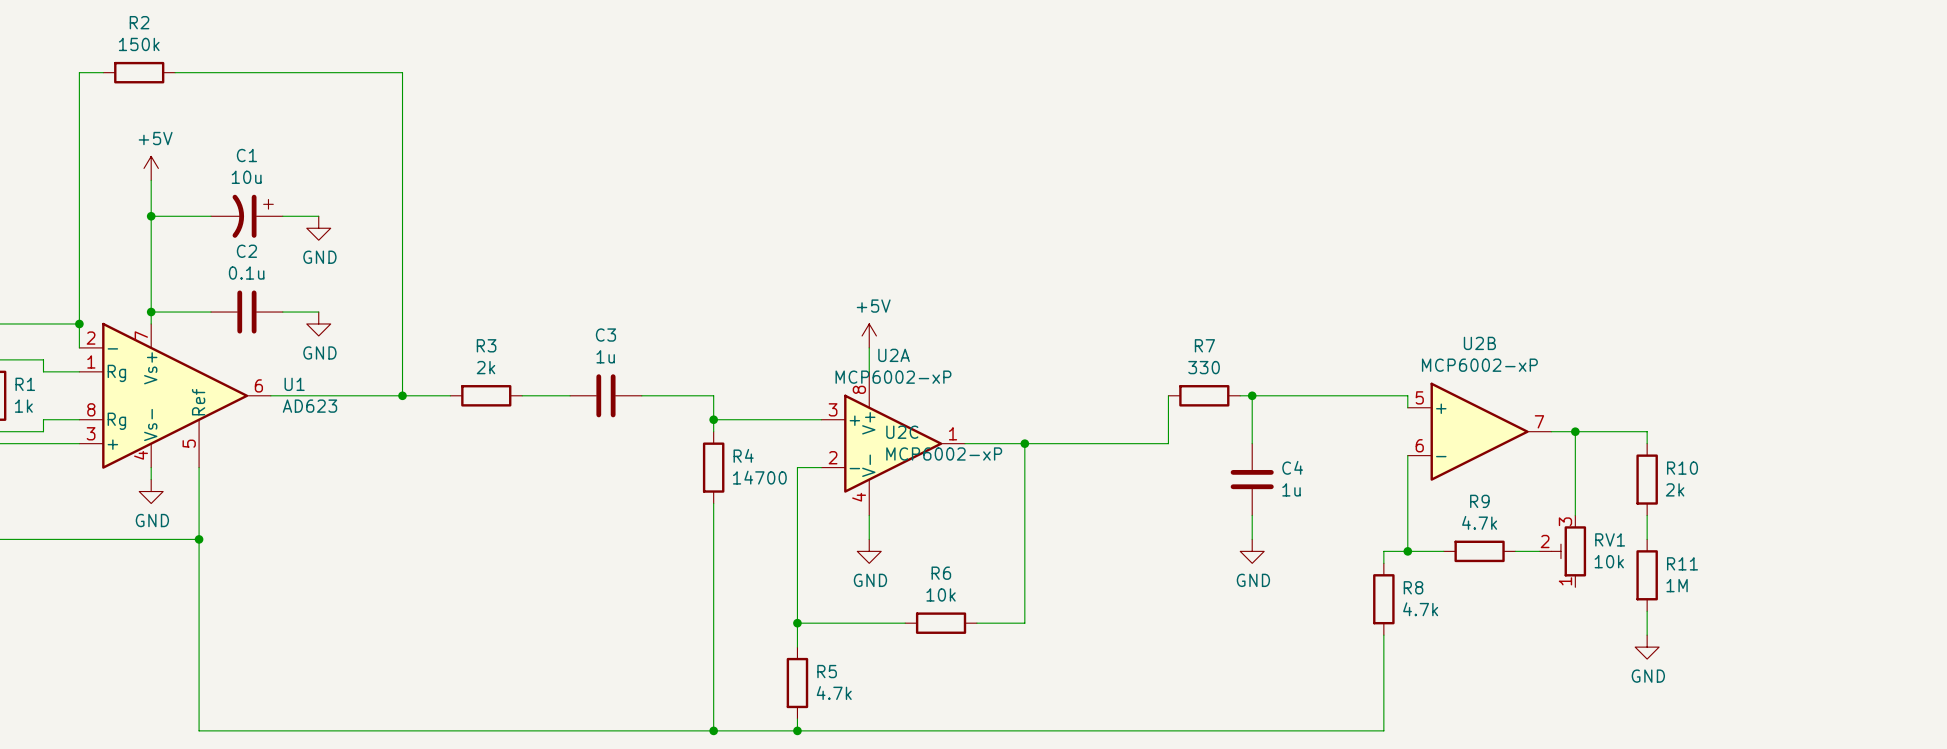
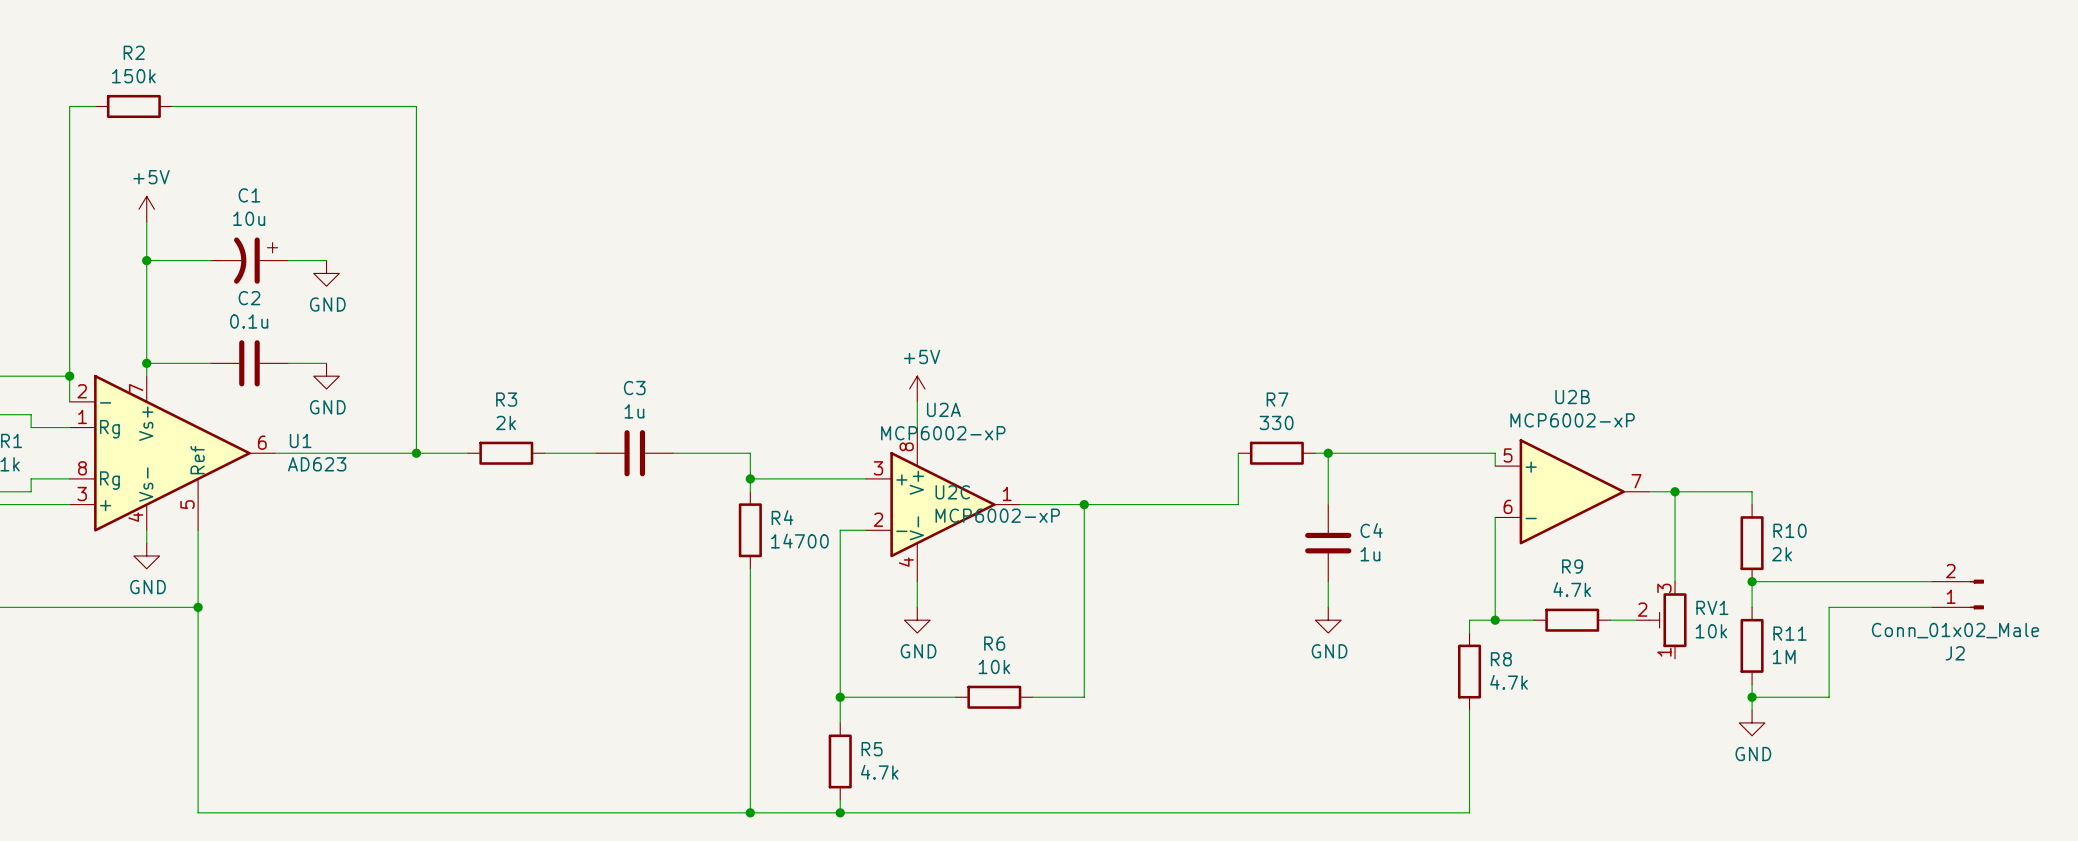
wire: none -> (1752, 581) (1931, 581)
junction: none -> (1752, 581)
J2: none -> Conn_01x02_Male (1957, 594)
wire: none -> (1931, 607) (1829, 607) (1829, 697) (1752, 697)
junction: none -> (1752, 697)

